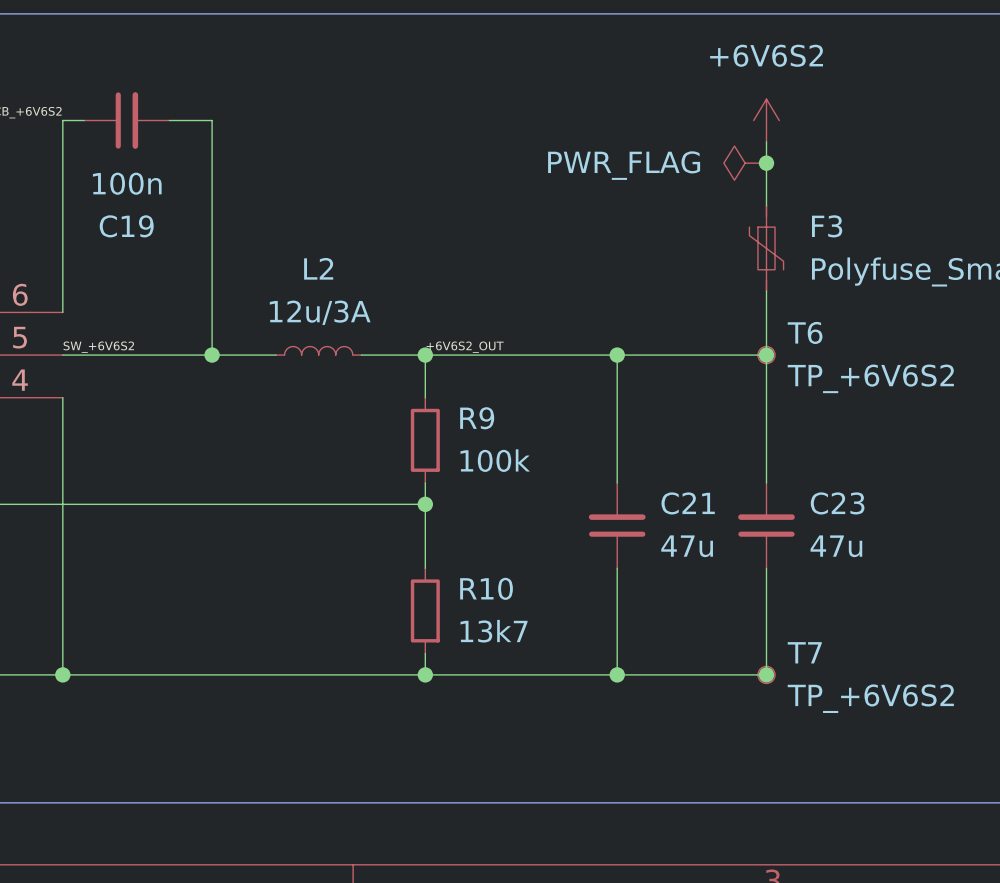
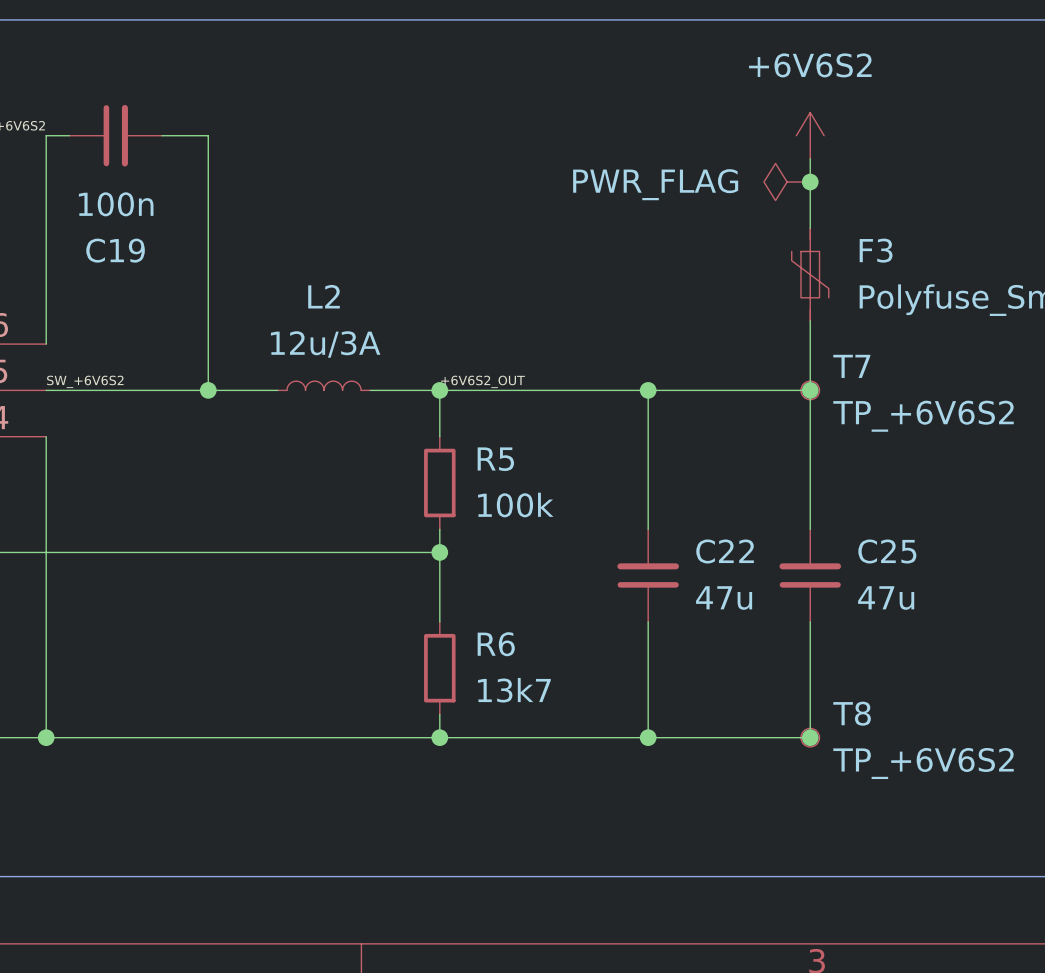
T6 name: T6 (805, 332) -> T7 (851, 366)
R9 name: R9 (477, 418) -> R5 (495, 459)
C21 name: C21 (688, 503) -> C22 (725, 551)
C23 name: C23 (837, 503) -> C25 (887, 551)
R10 name: R10 (486, 588) -> R6 (496, 644)
T7 name: T7 (804, 652) -> T8 (852, 713)

